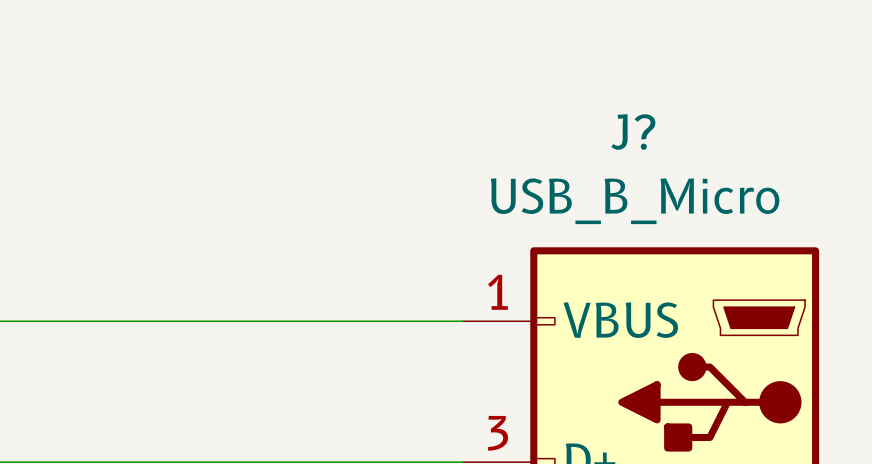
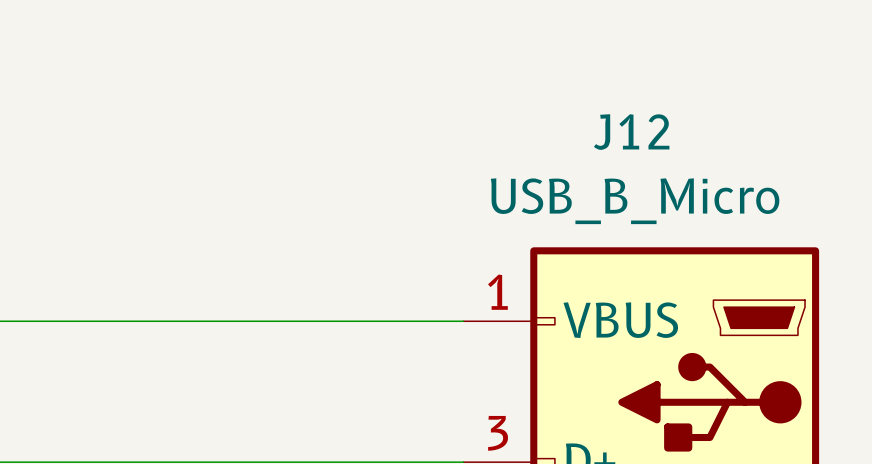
J? name: J? (633, 132) -> J12 (631, 132)

